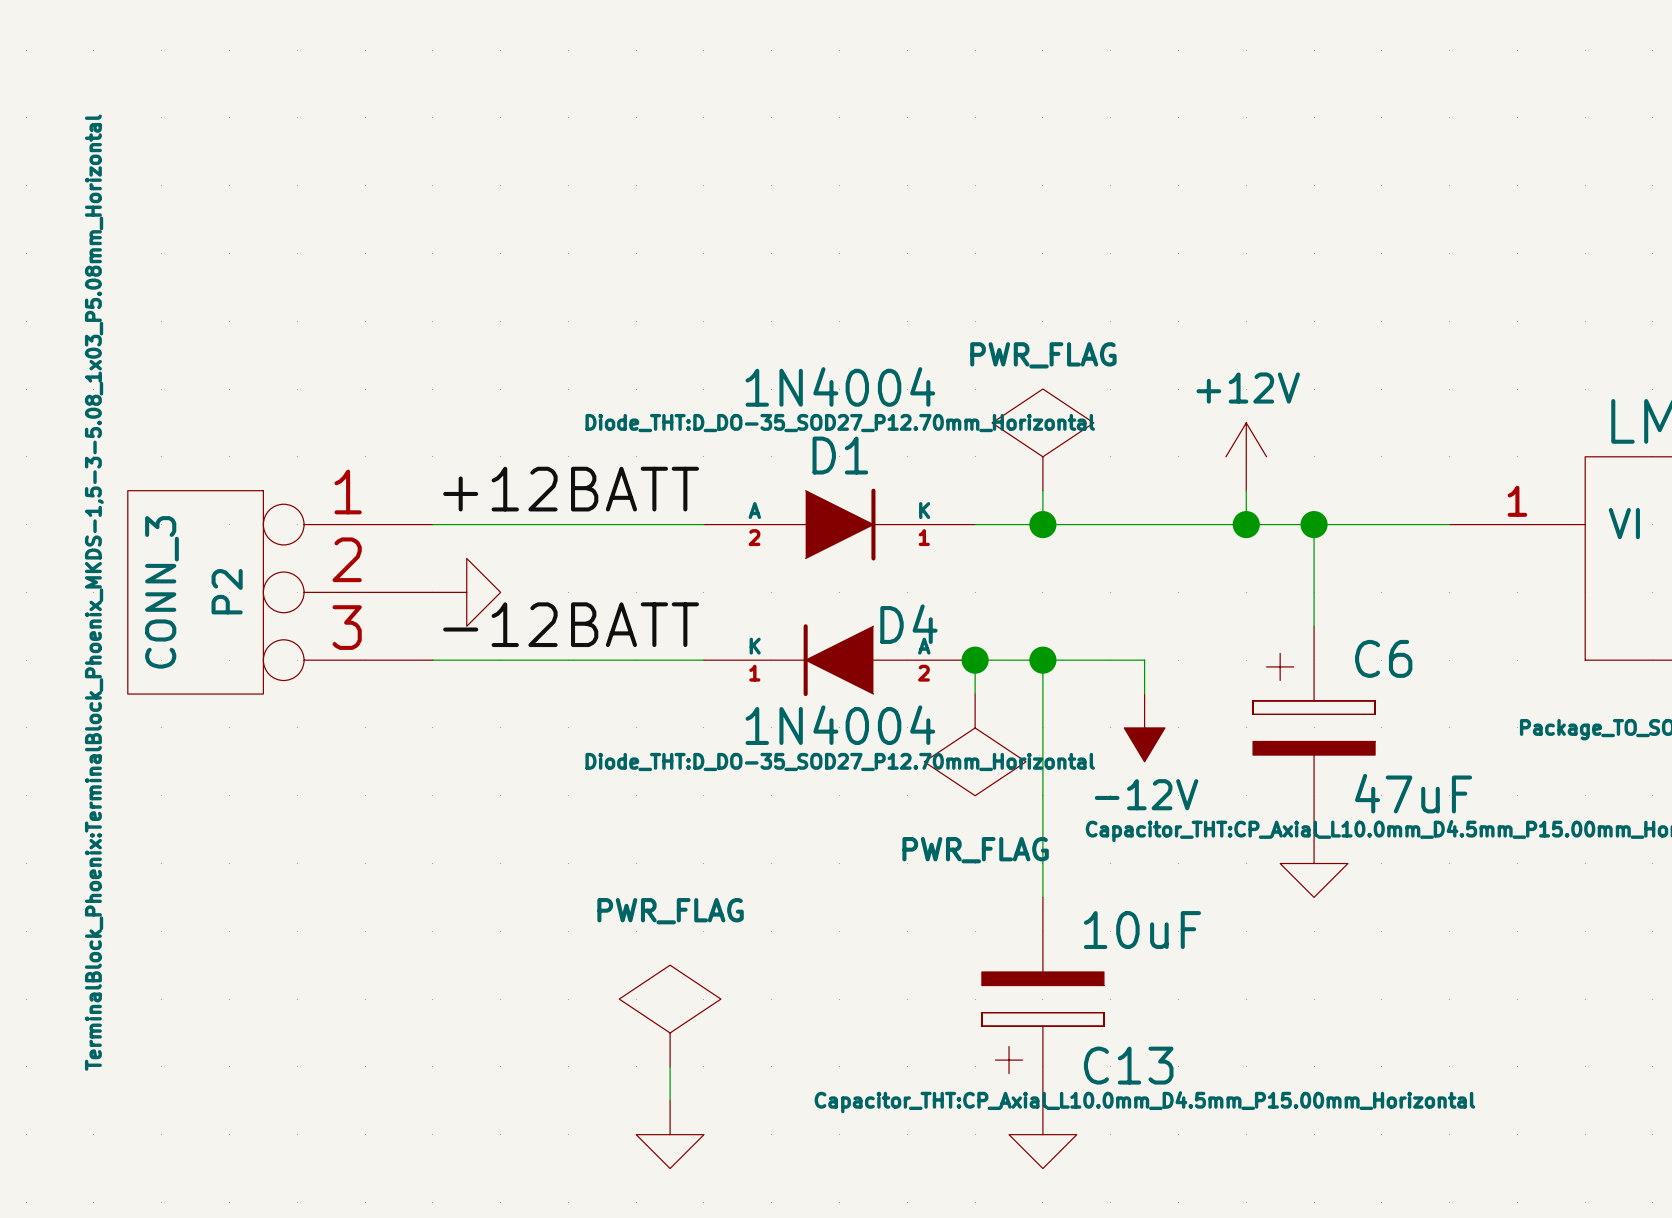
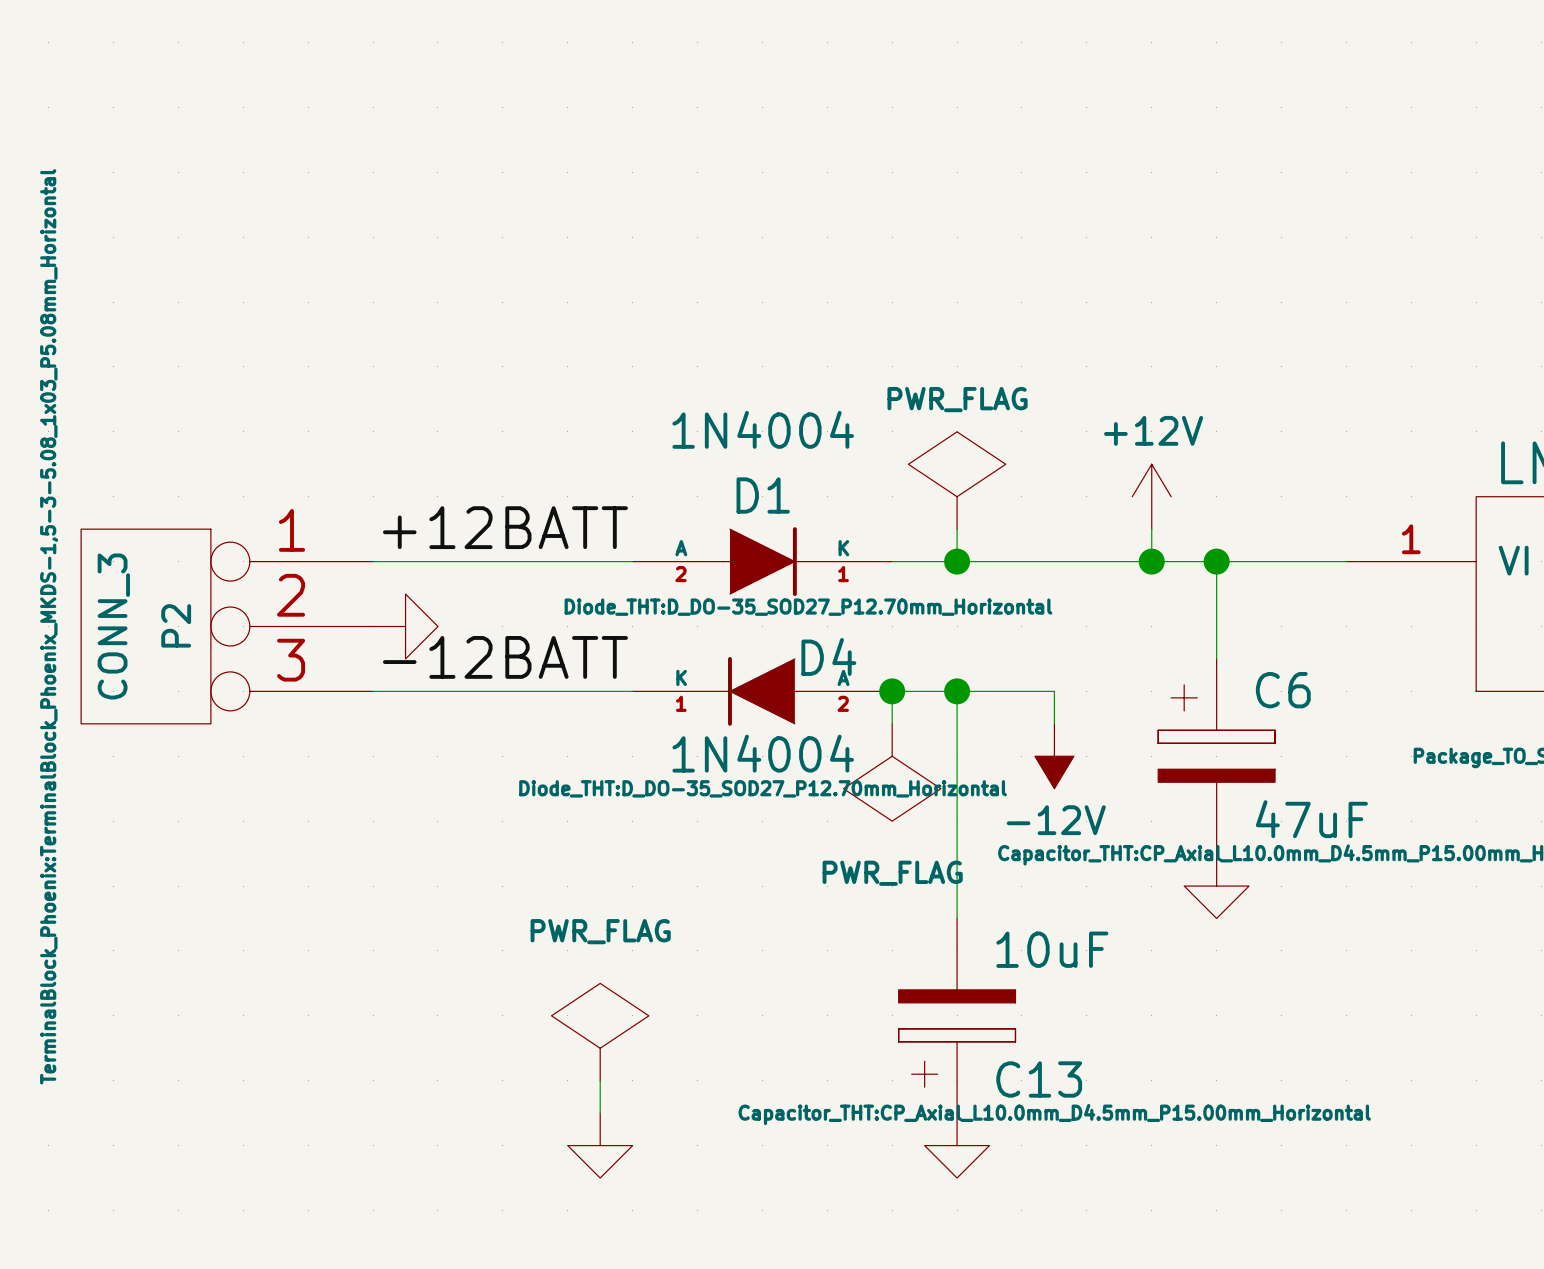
D1 text position: Diode_THT:D_DO-35_SOD27_P12.70mm_Horizontal (840, 423) -> Diode_THT:D_DO-35_SOD27_P12.70mm_Horizontal (808, 607)

